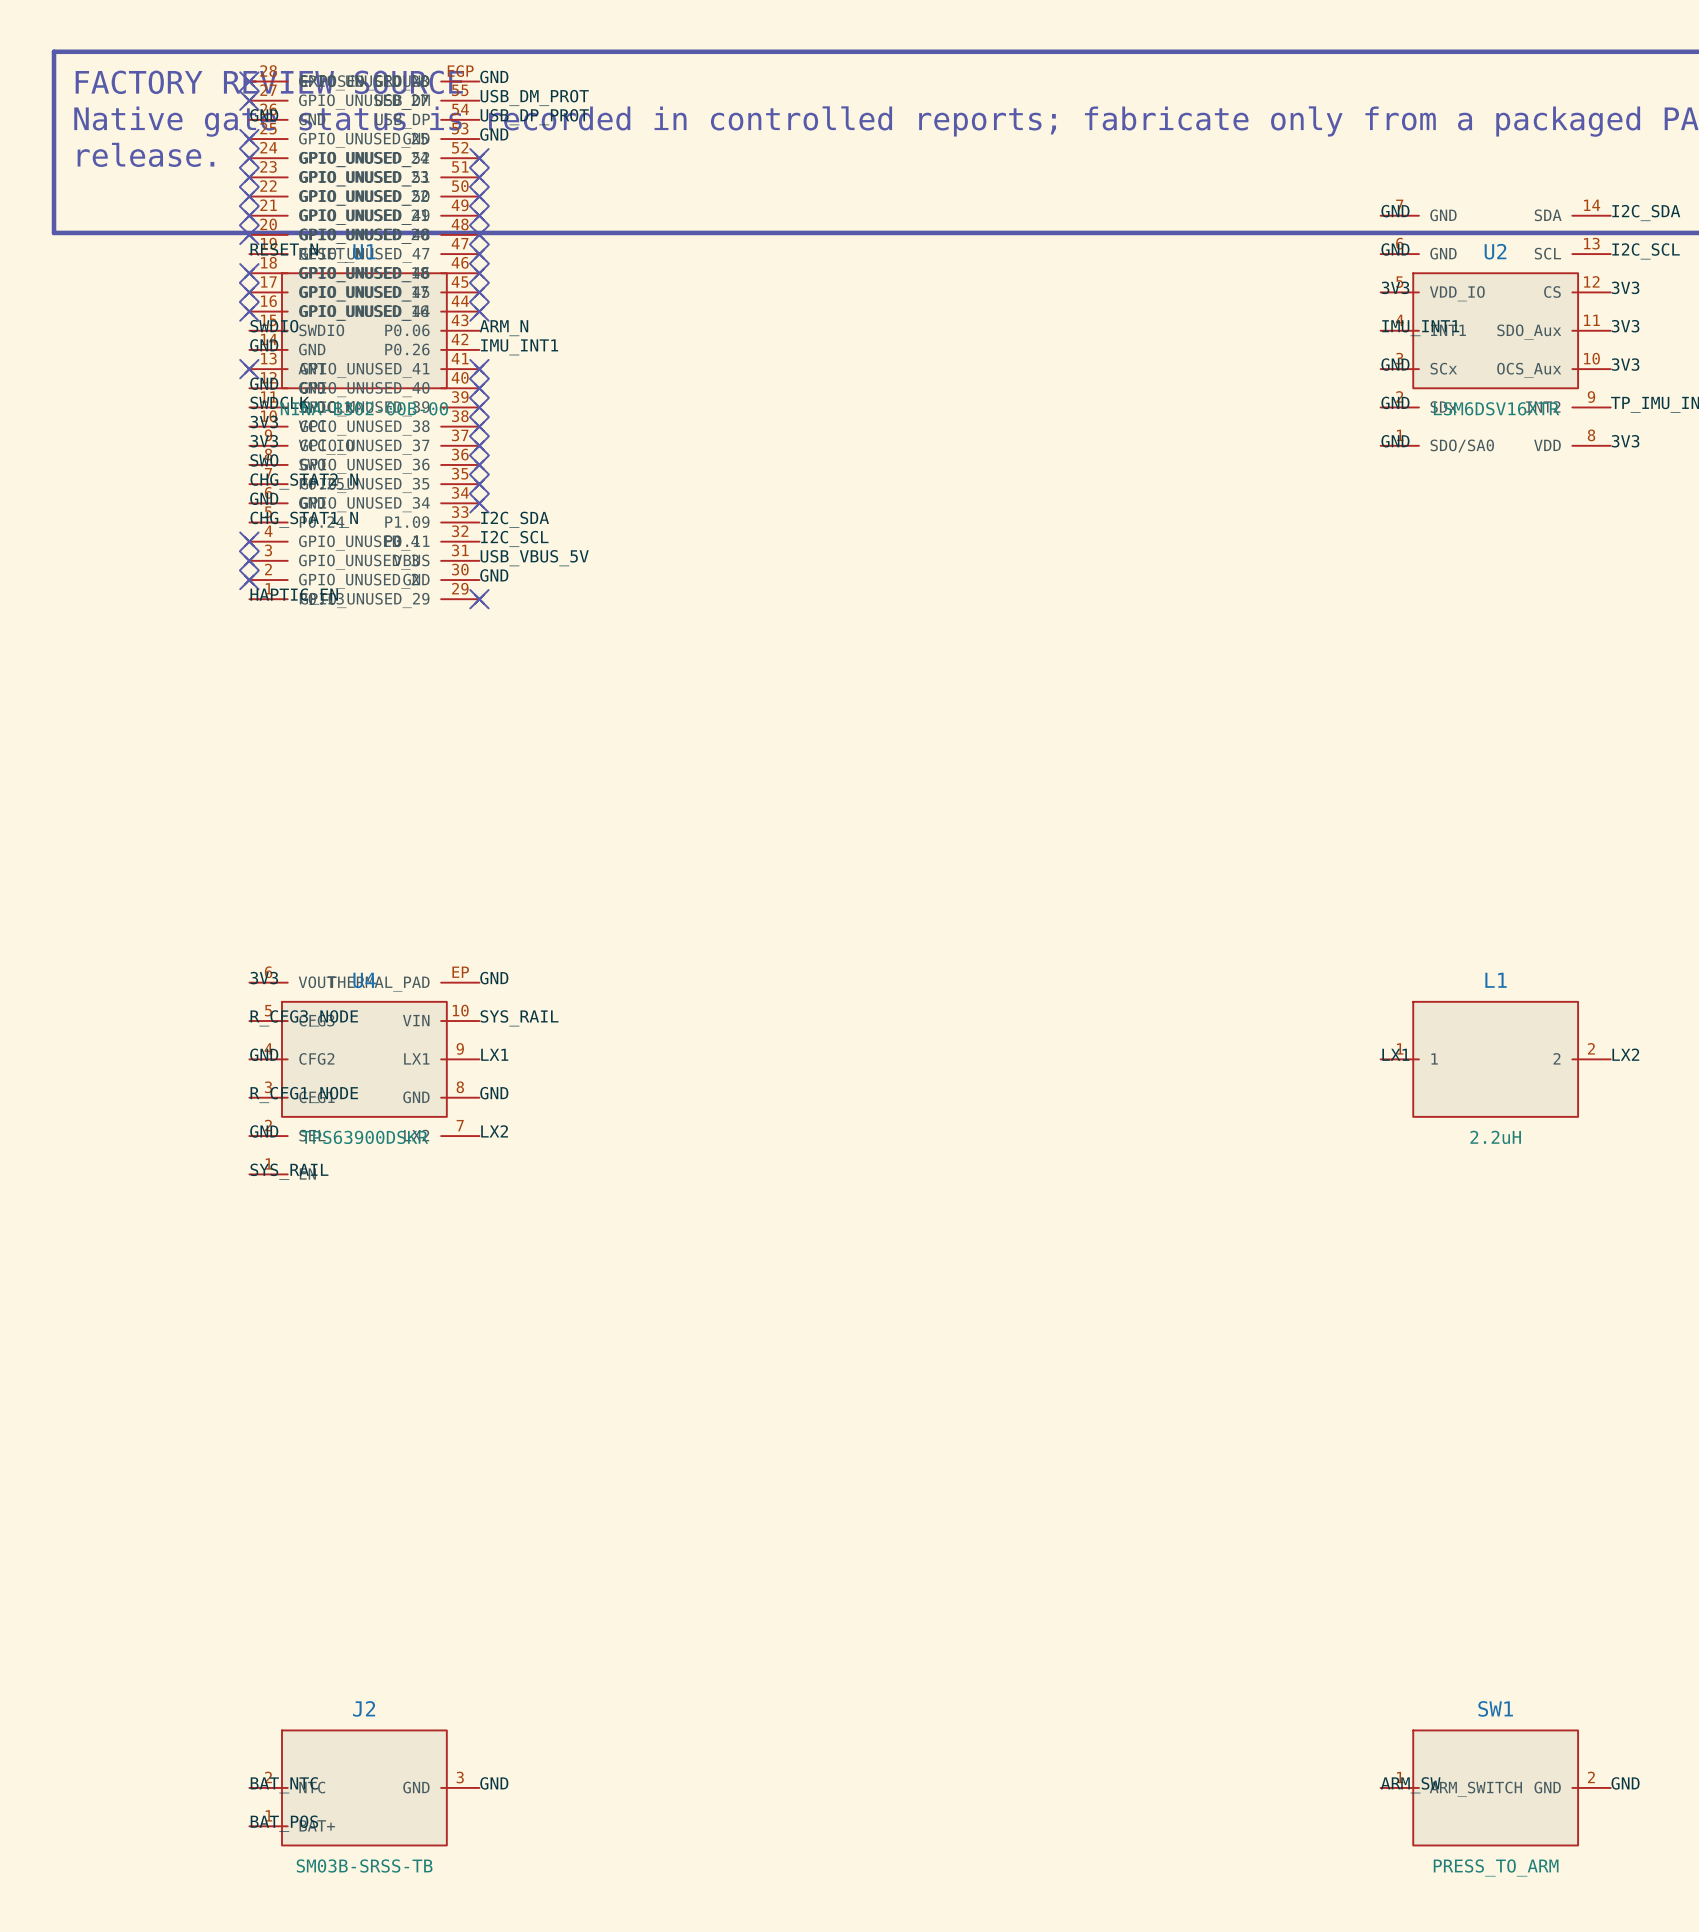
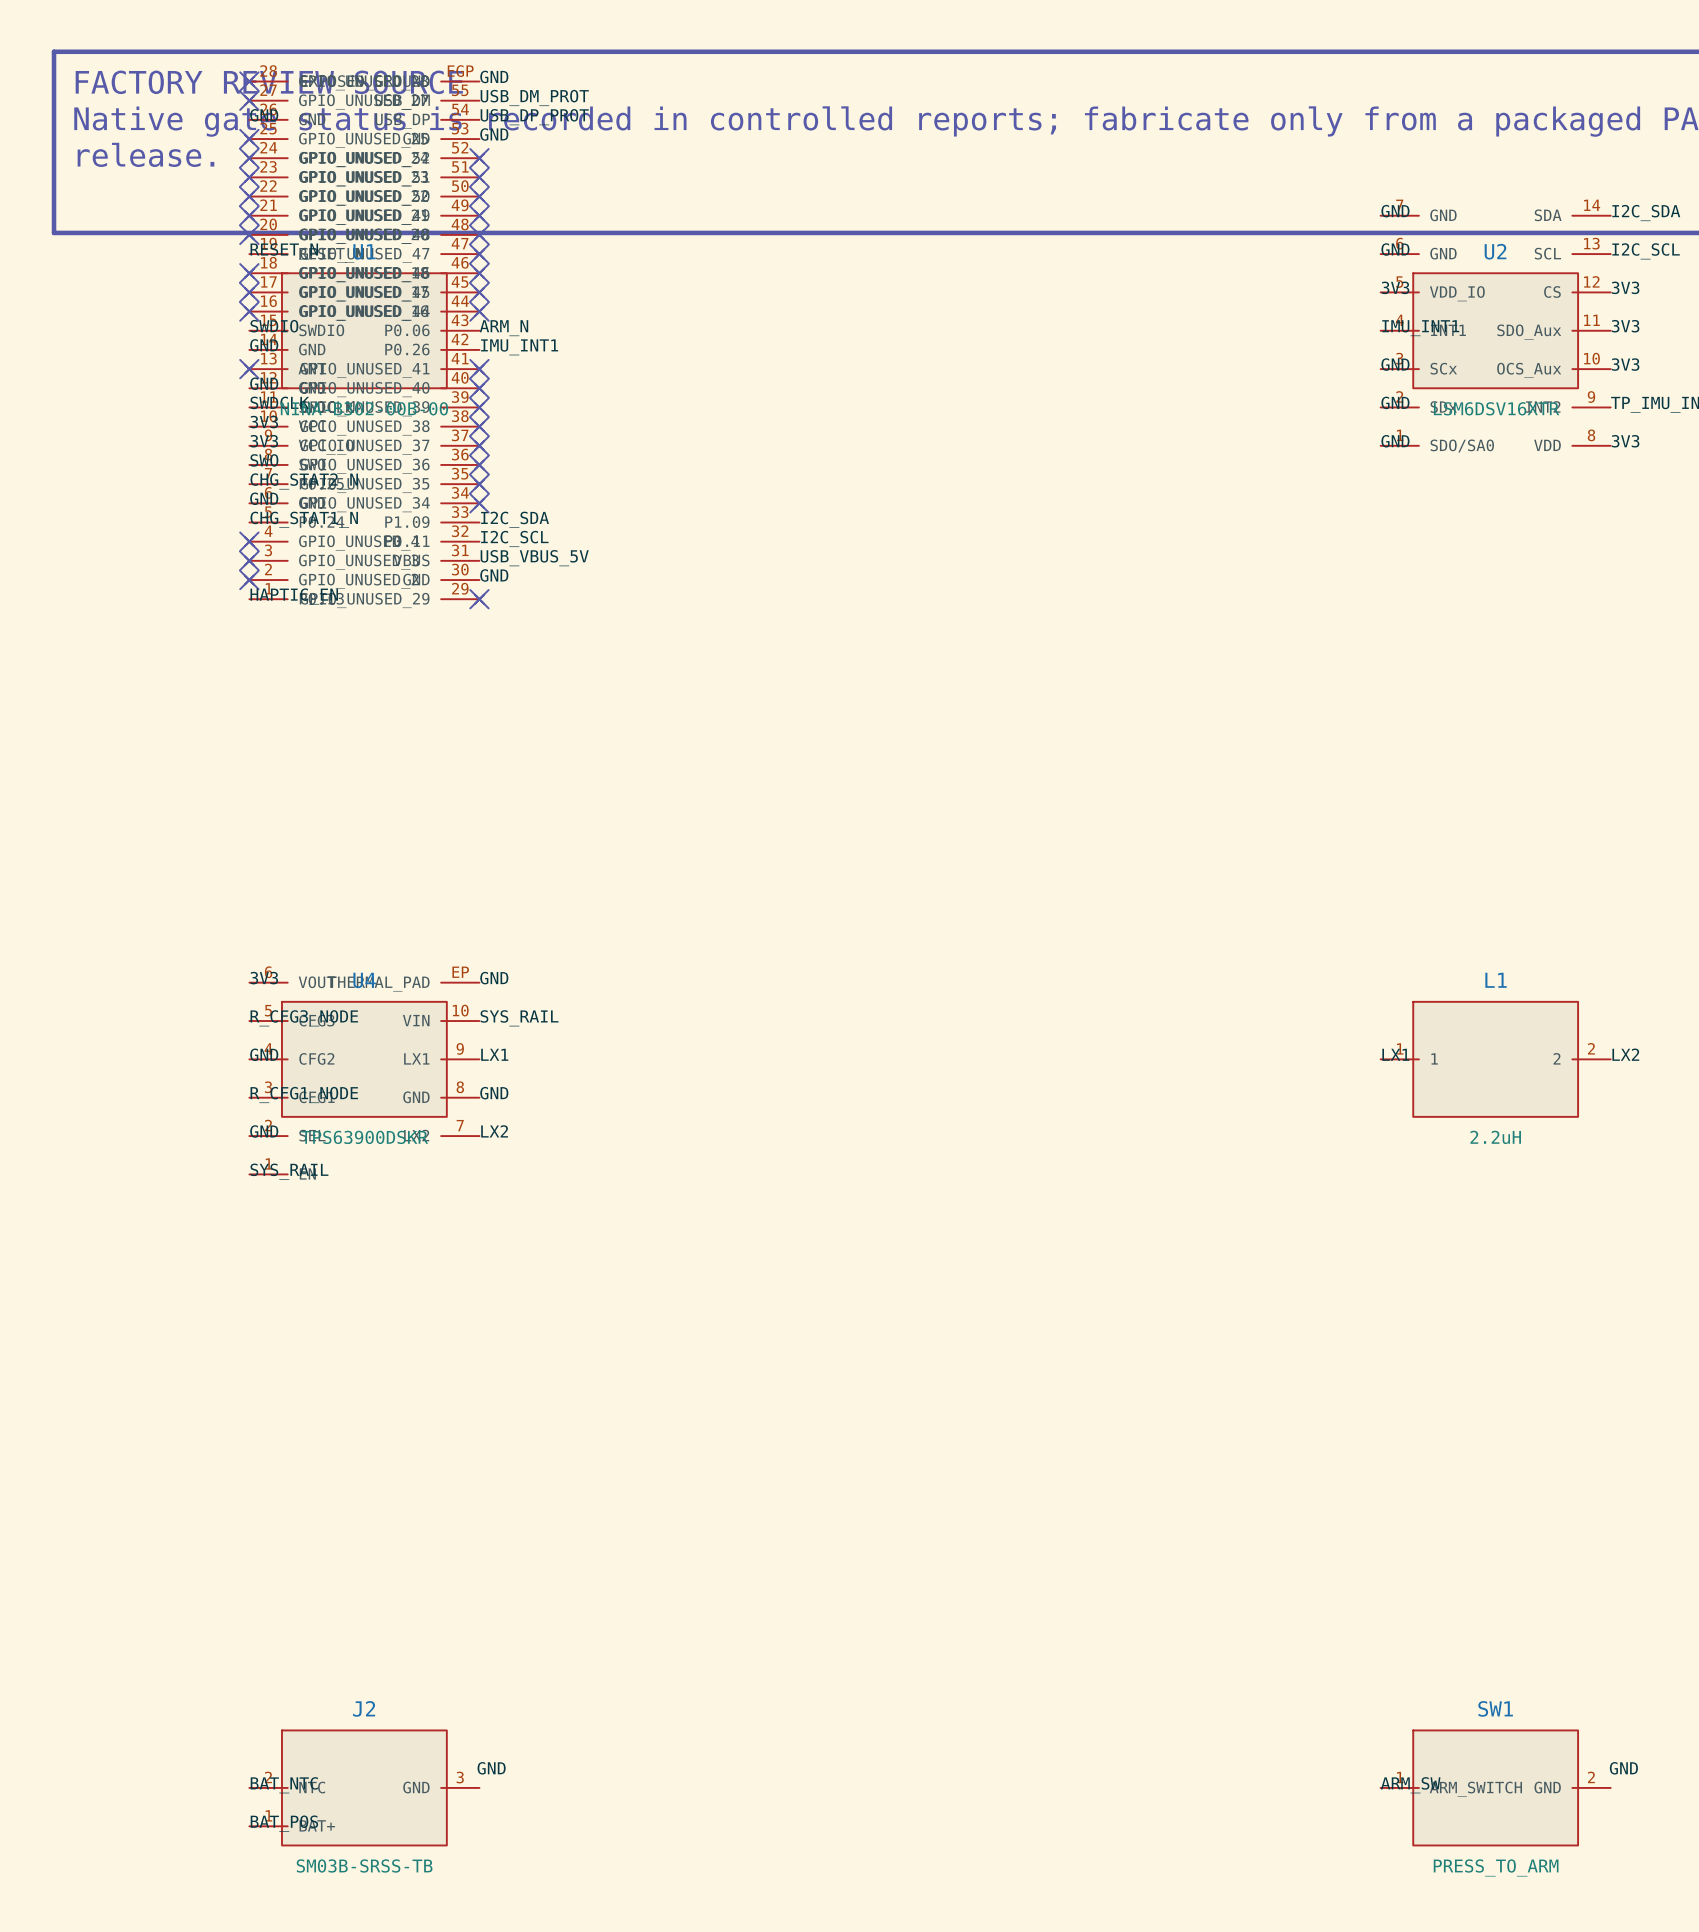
label position: GND (494, 1783) -> GND (491, 1768)
label position: GND (1625, 1783) -> GND (1623, 1768)

